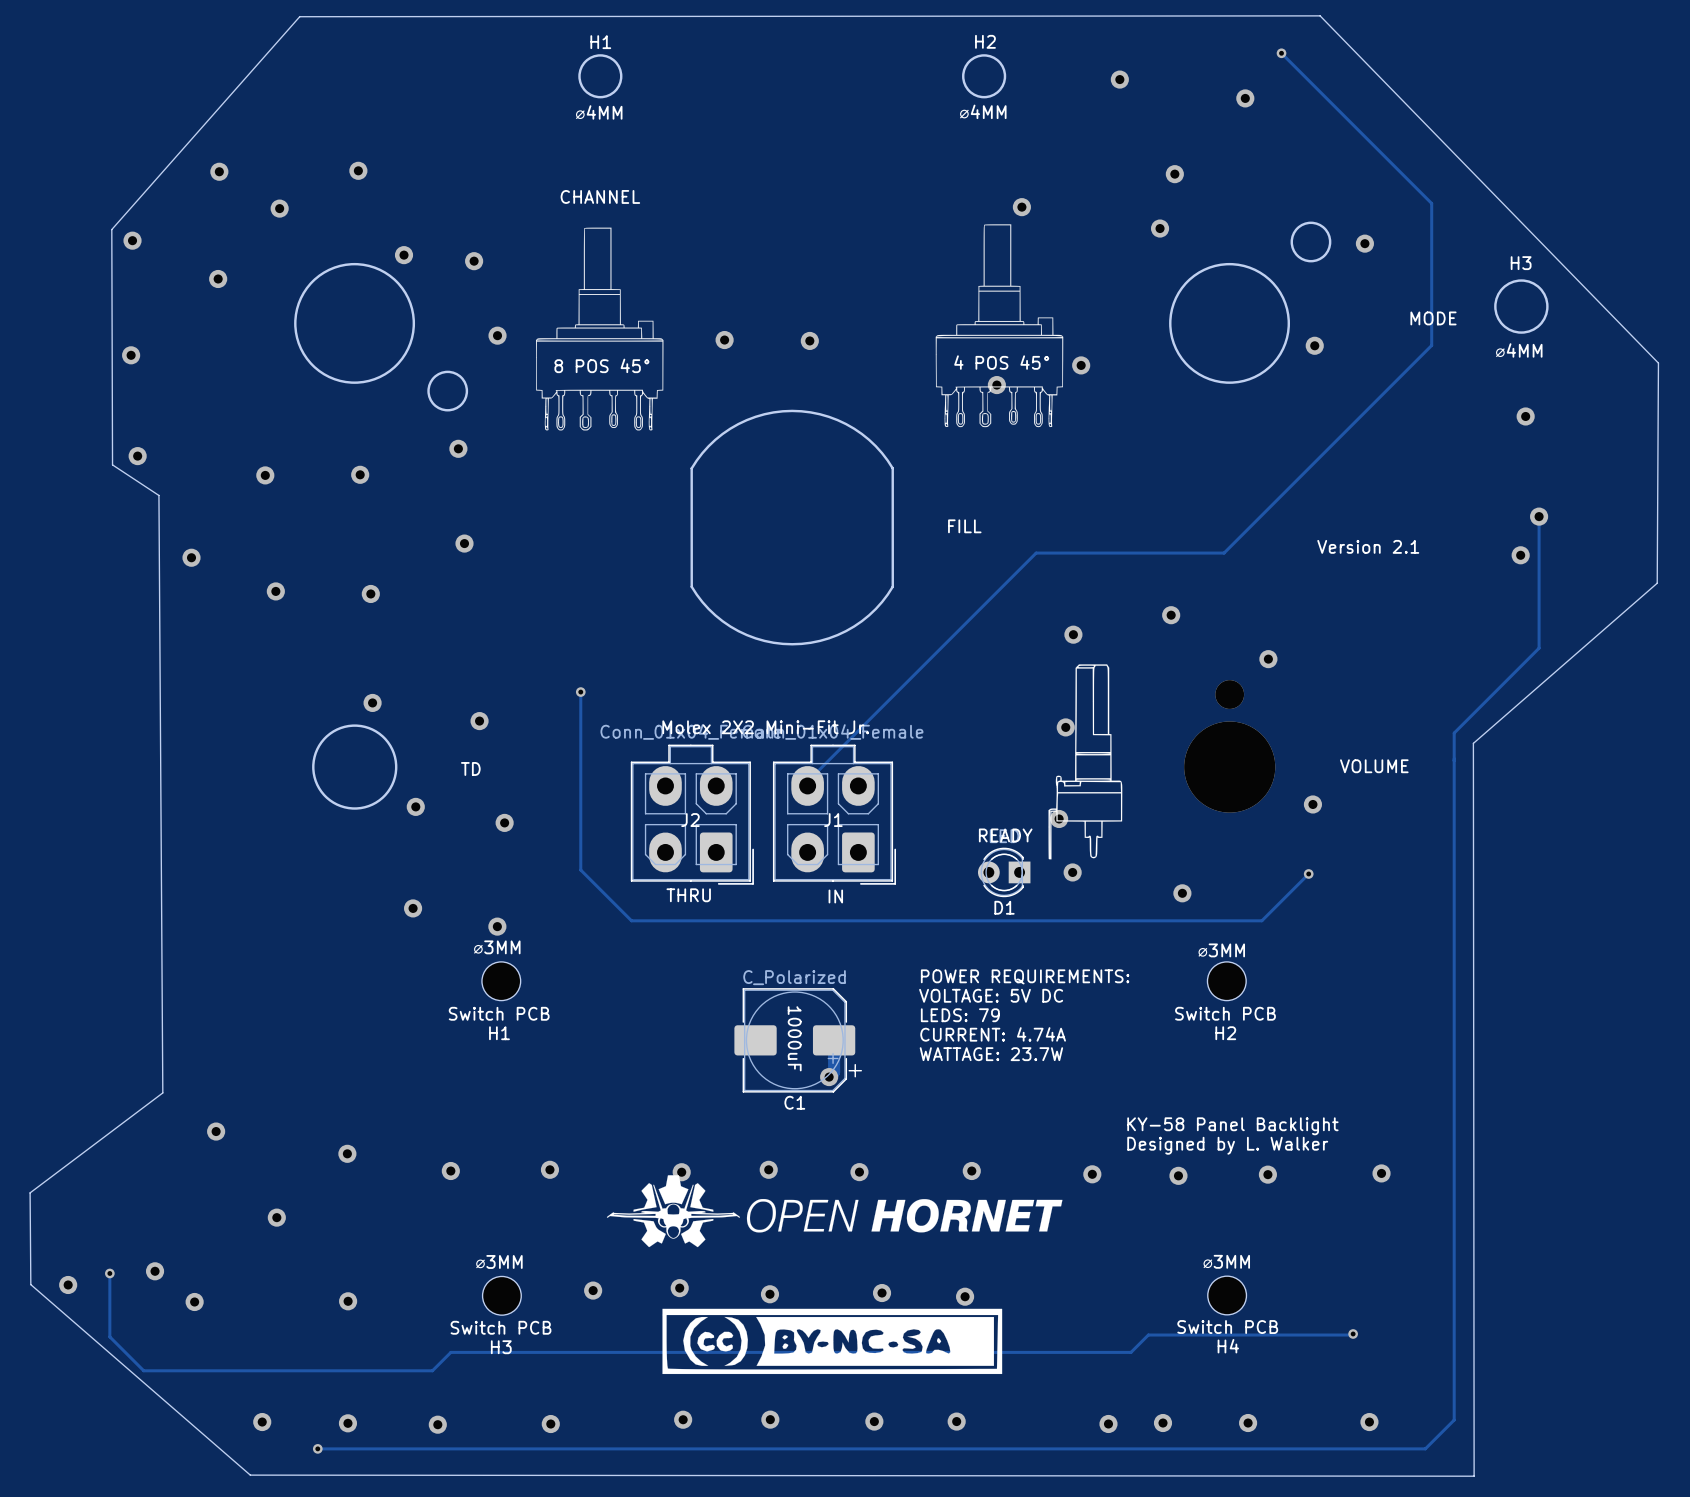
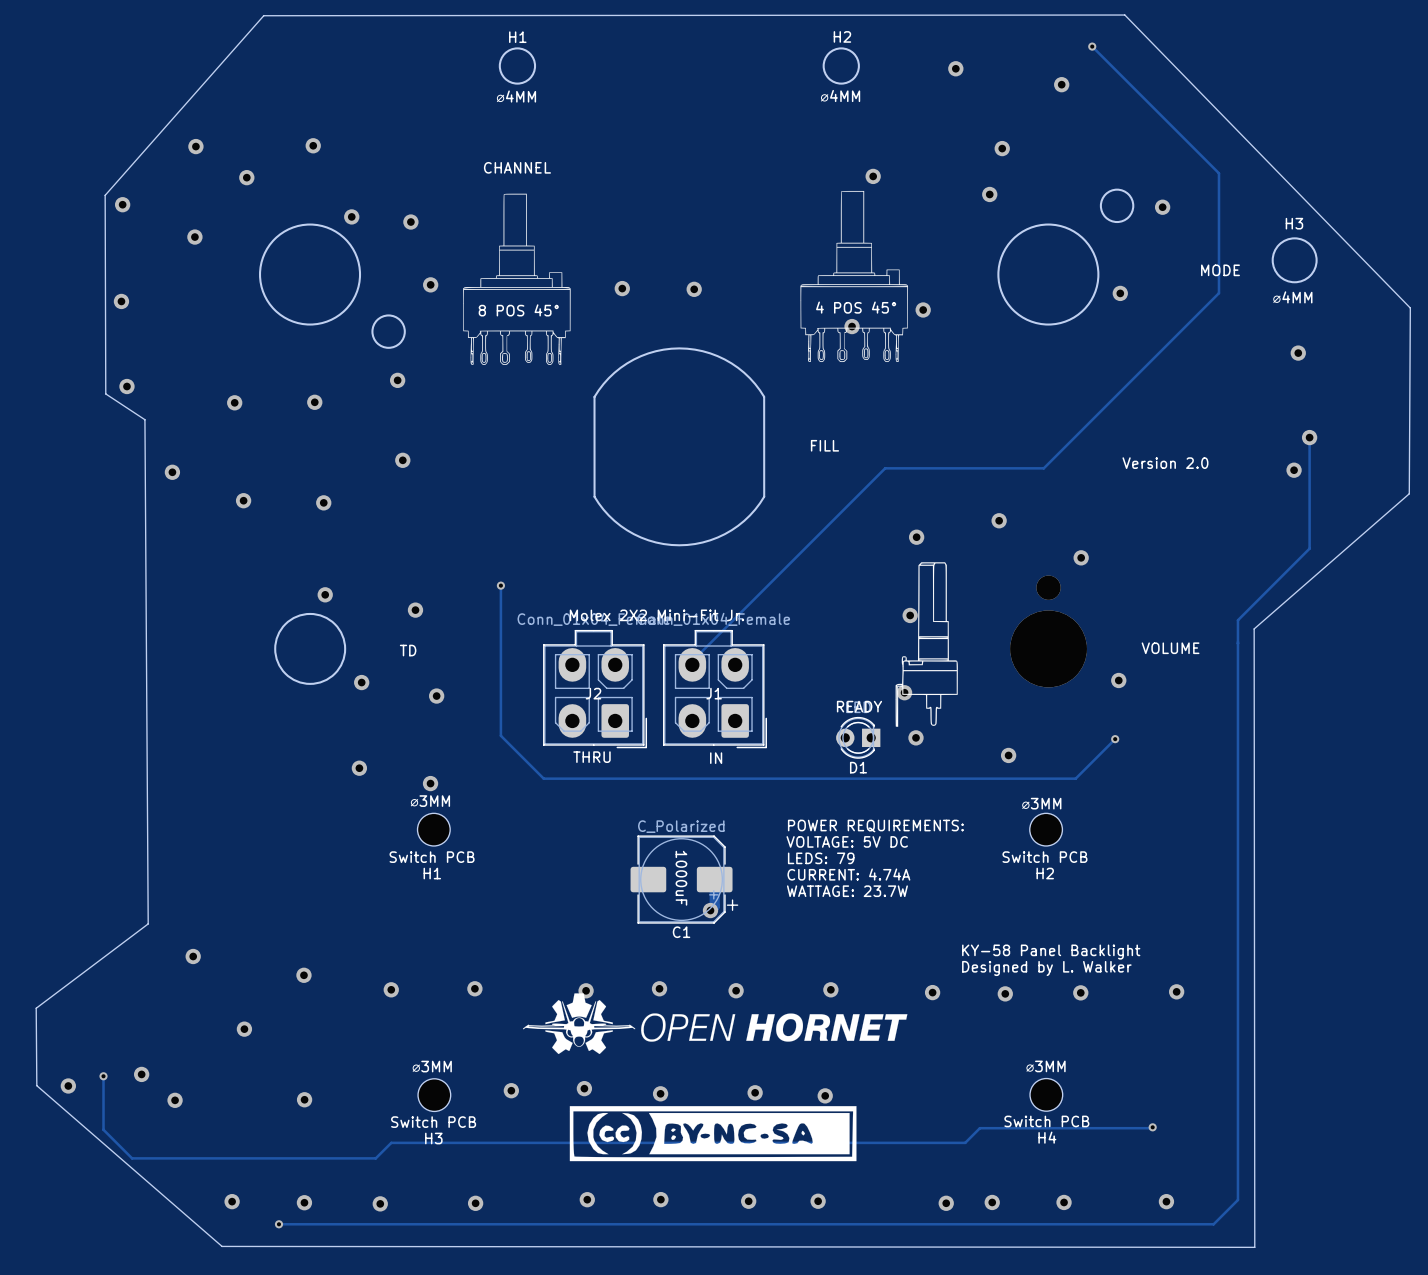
text: Version 2.1 (1368, 546) -> Version 2.0 (1165, 463)

